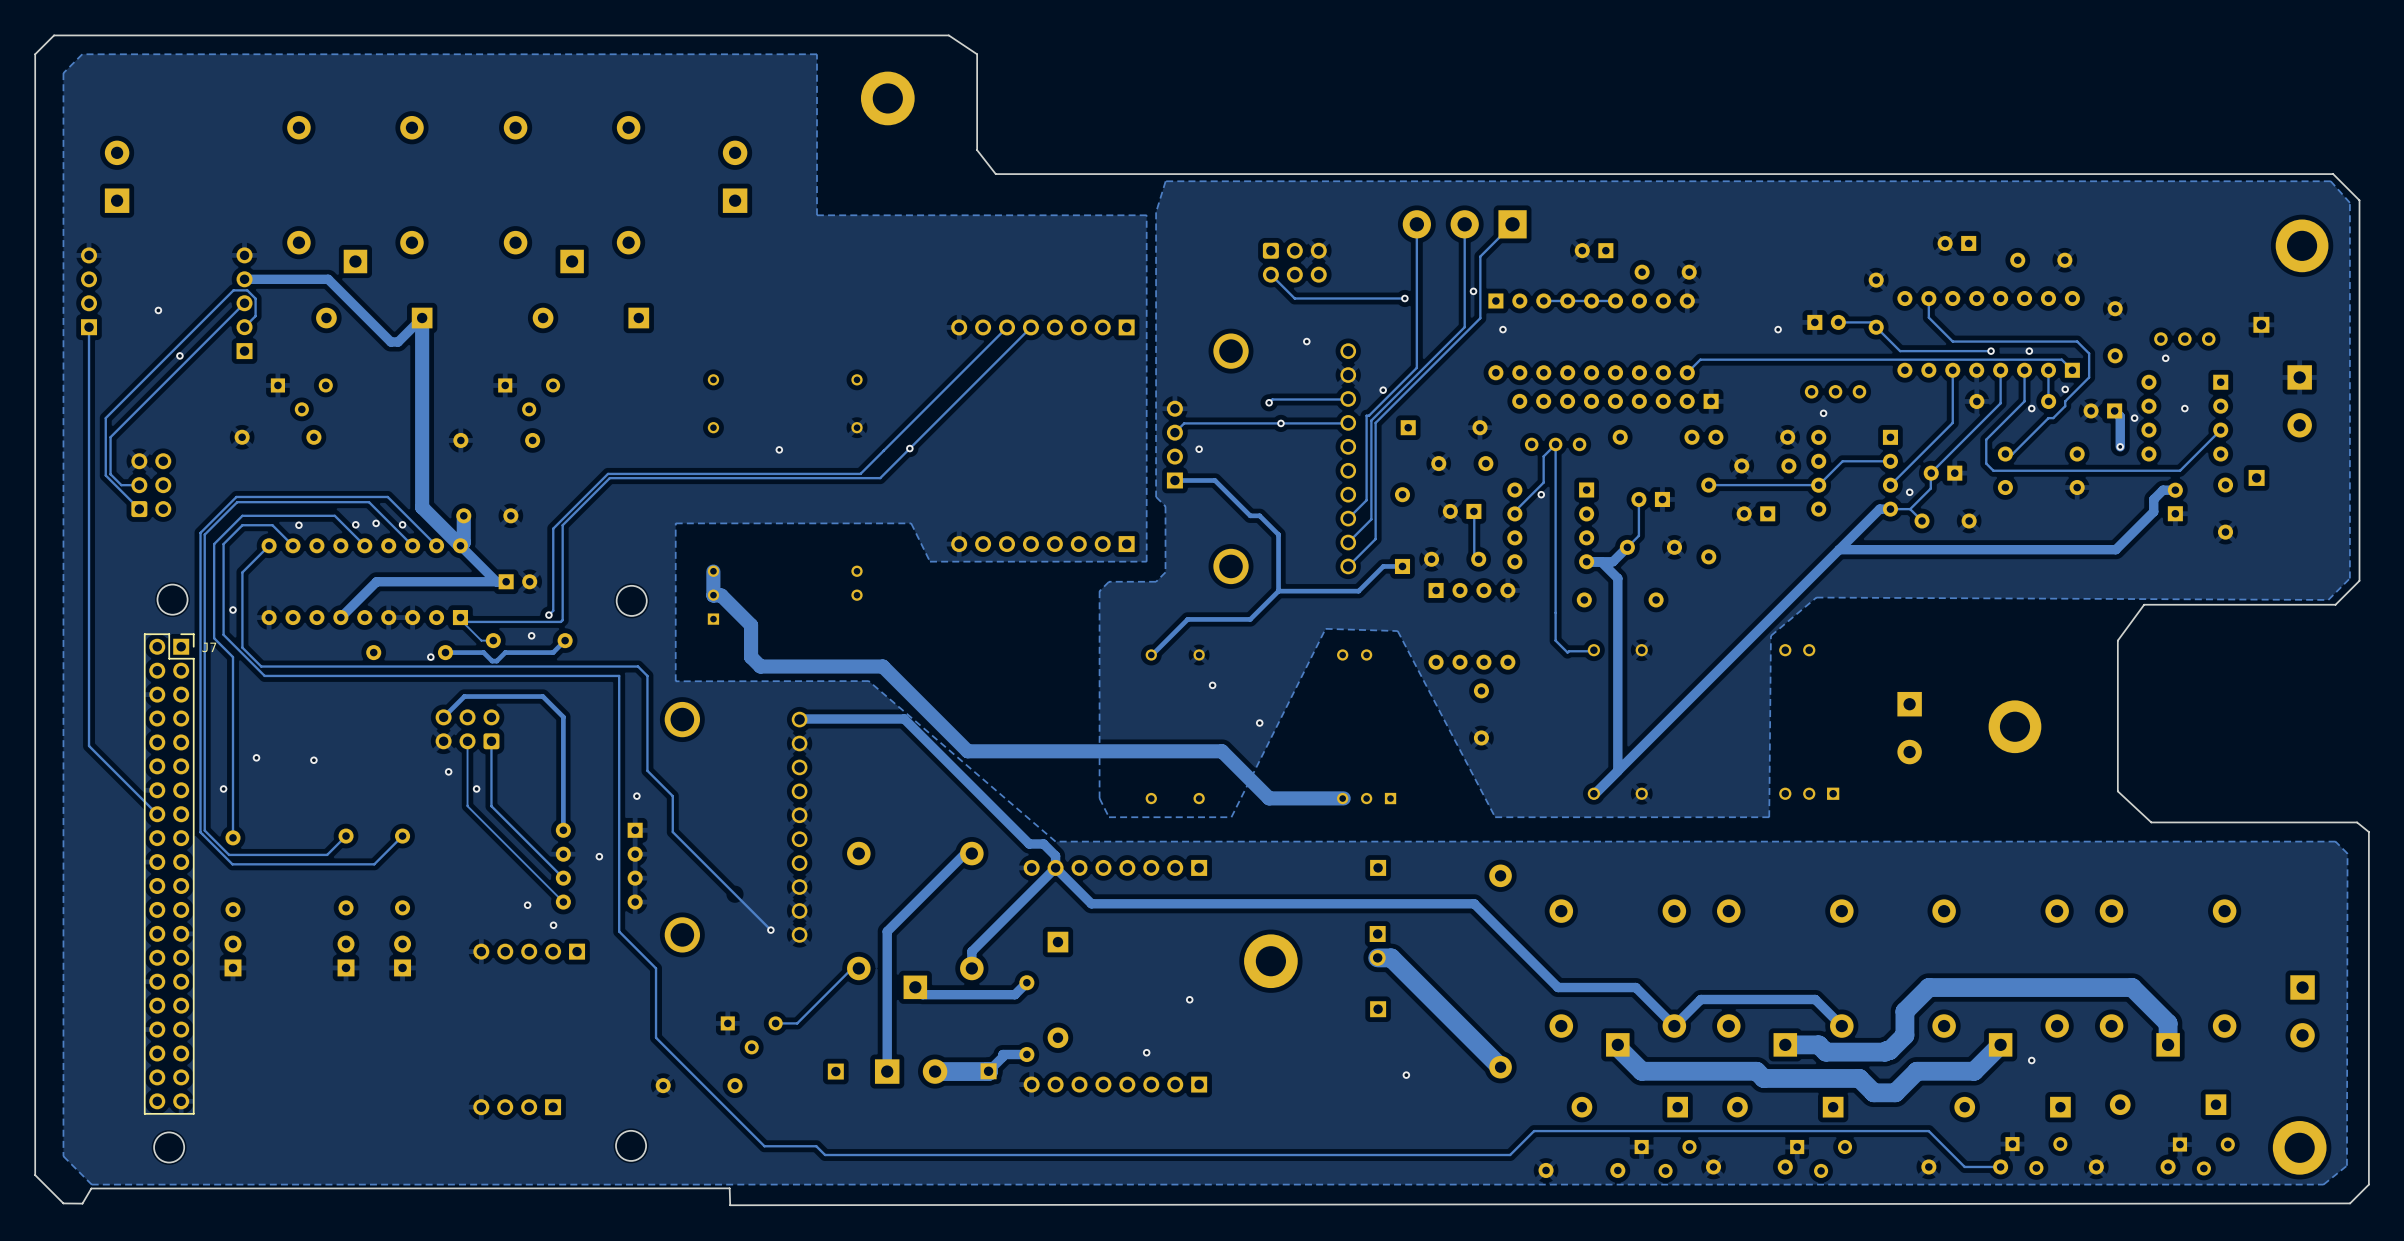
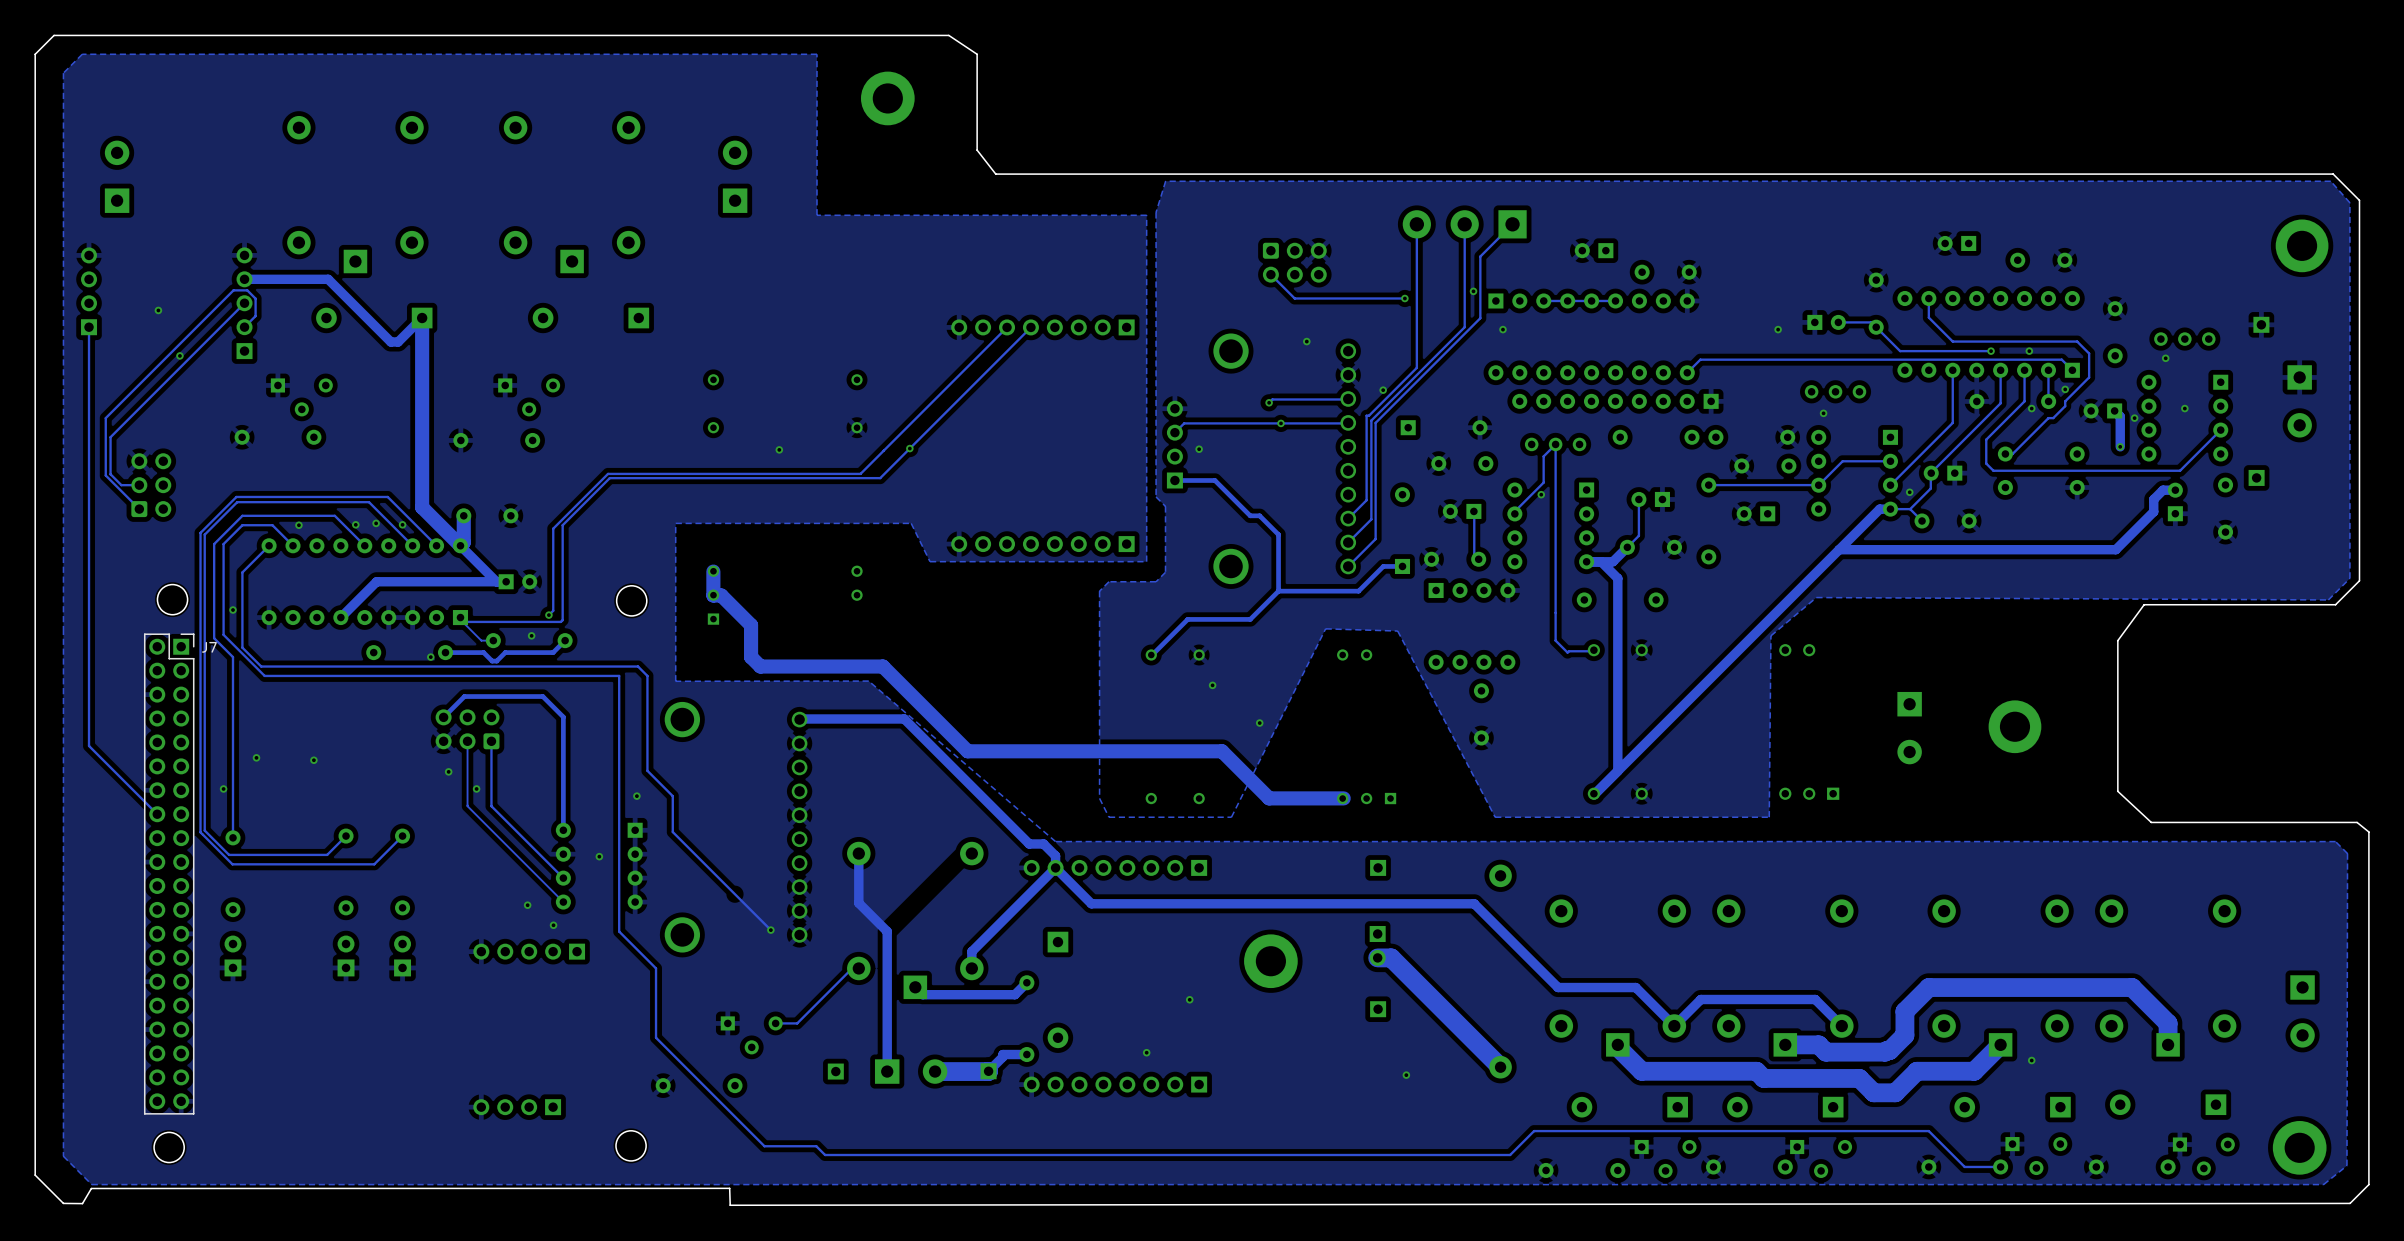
track: (965, 853) (887, 931) -> (858, 853) (858, 903) (887, 931)

